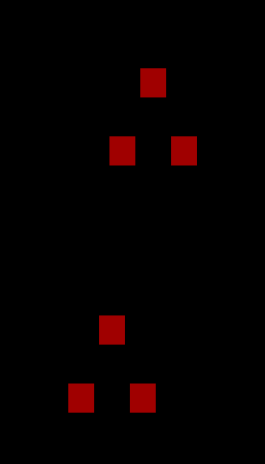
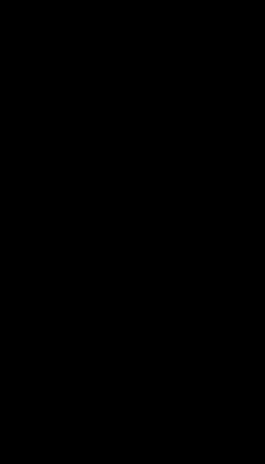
part: (153, 116) -> none
part: (112, 364) -> none

